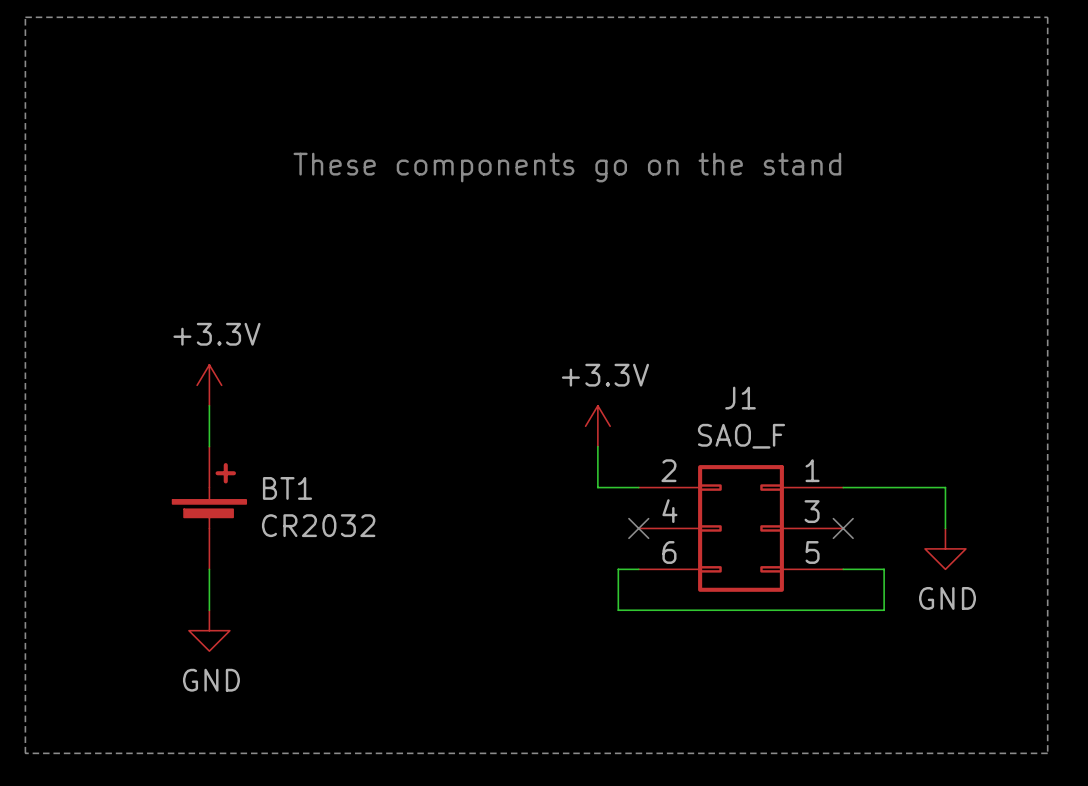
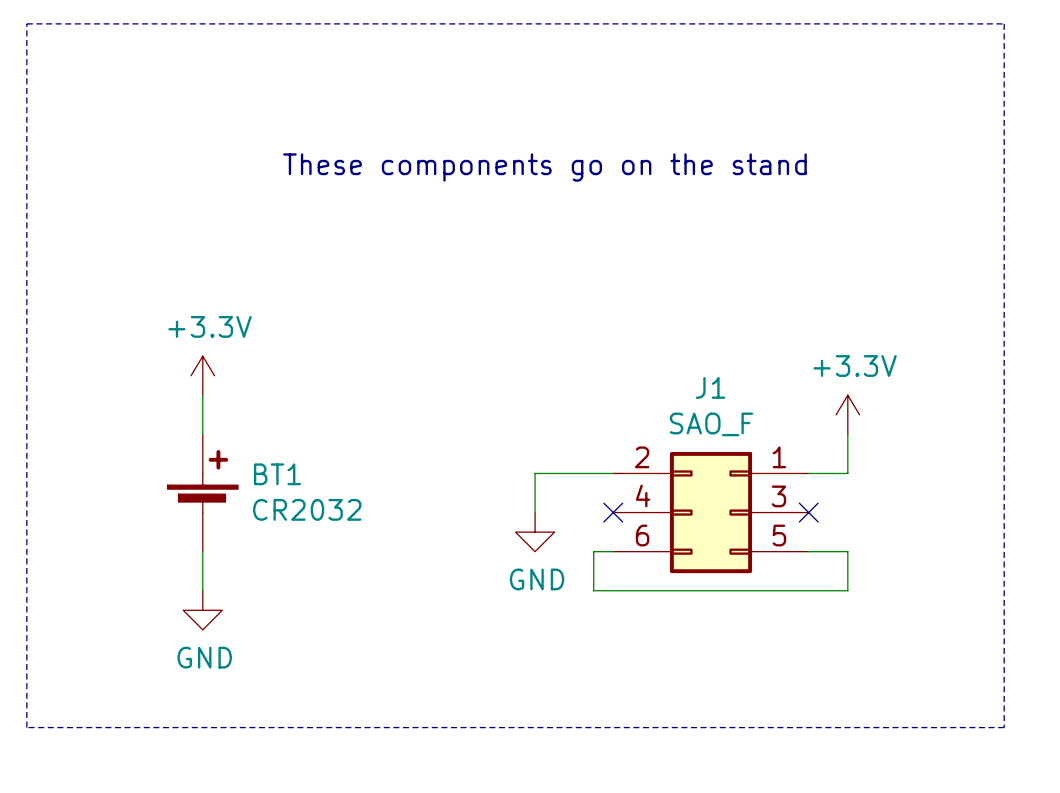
power symbol position: +3.3V (597, 426) -> +3.3V (847, 414)
wire: (597, 446) (597, 487) -> (535, 512) (535, 473) (574, 473)
wire: (884, 487) (945, 487) (945, 528) -> (847, 473) (847, 434)
power symbol position: GND (945, 548) -> GND (535, 532)

